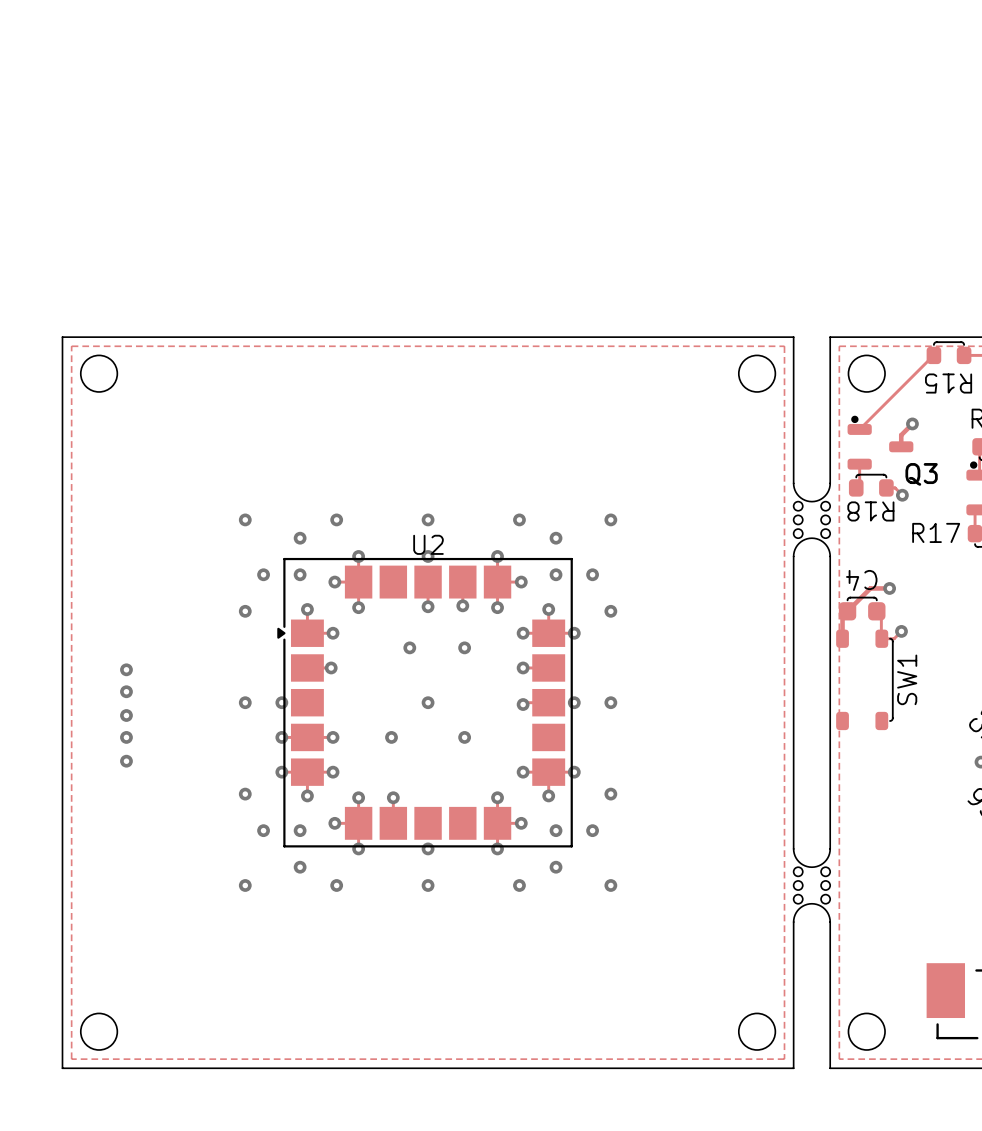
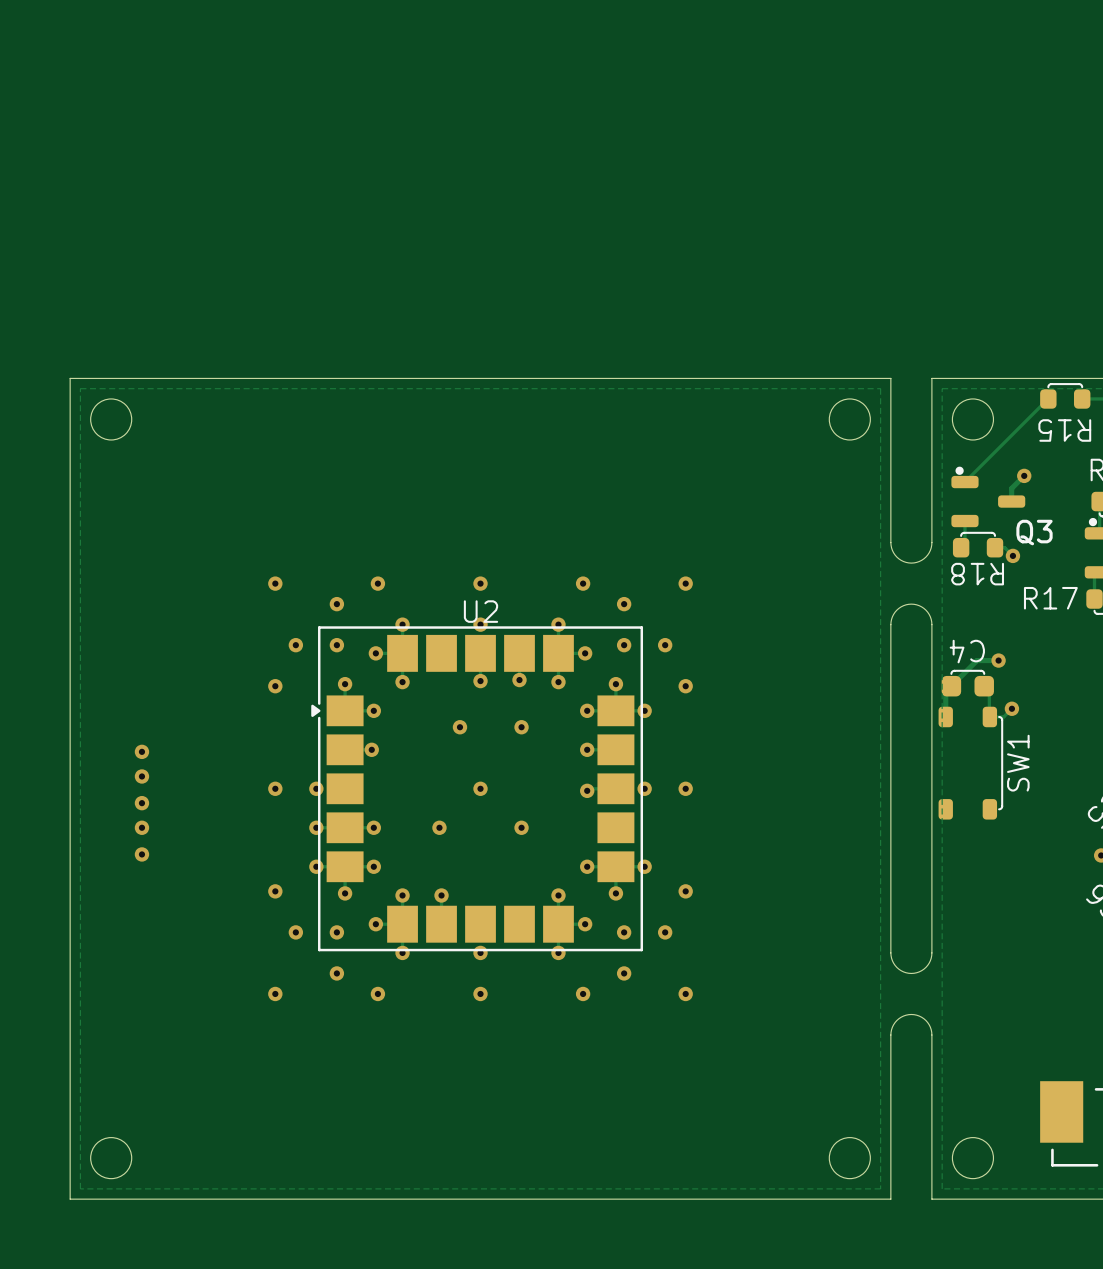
part: (811, 519) -> none
part: (811, 885) -> none

